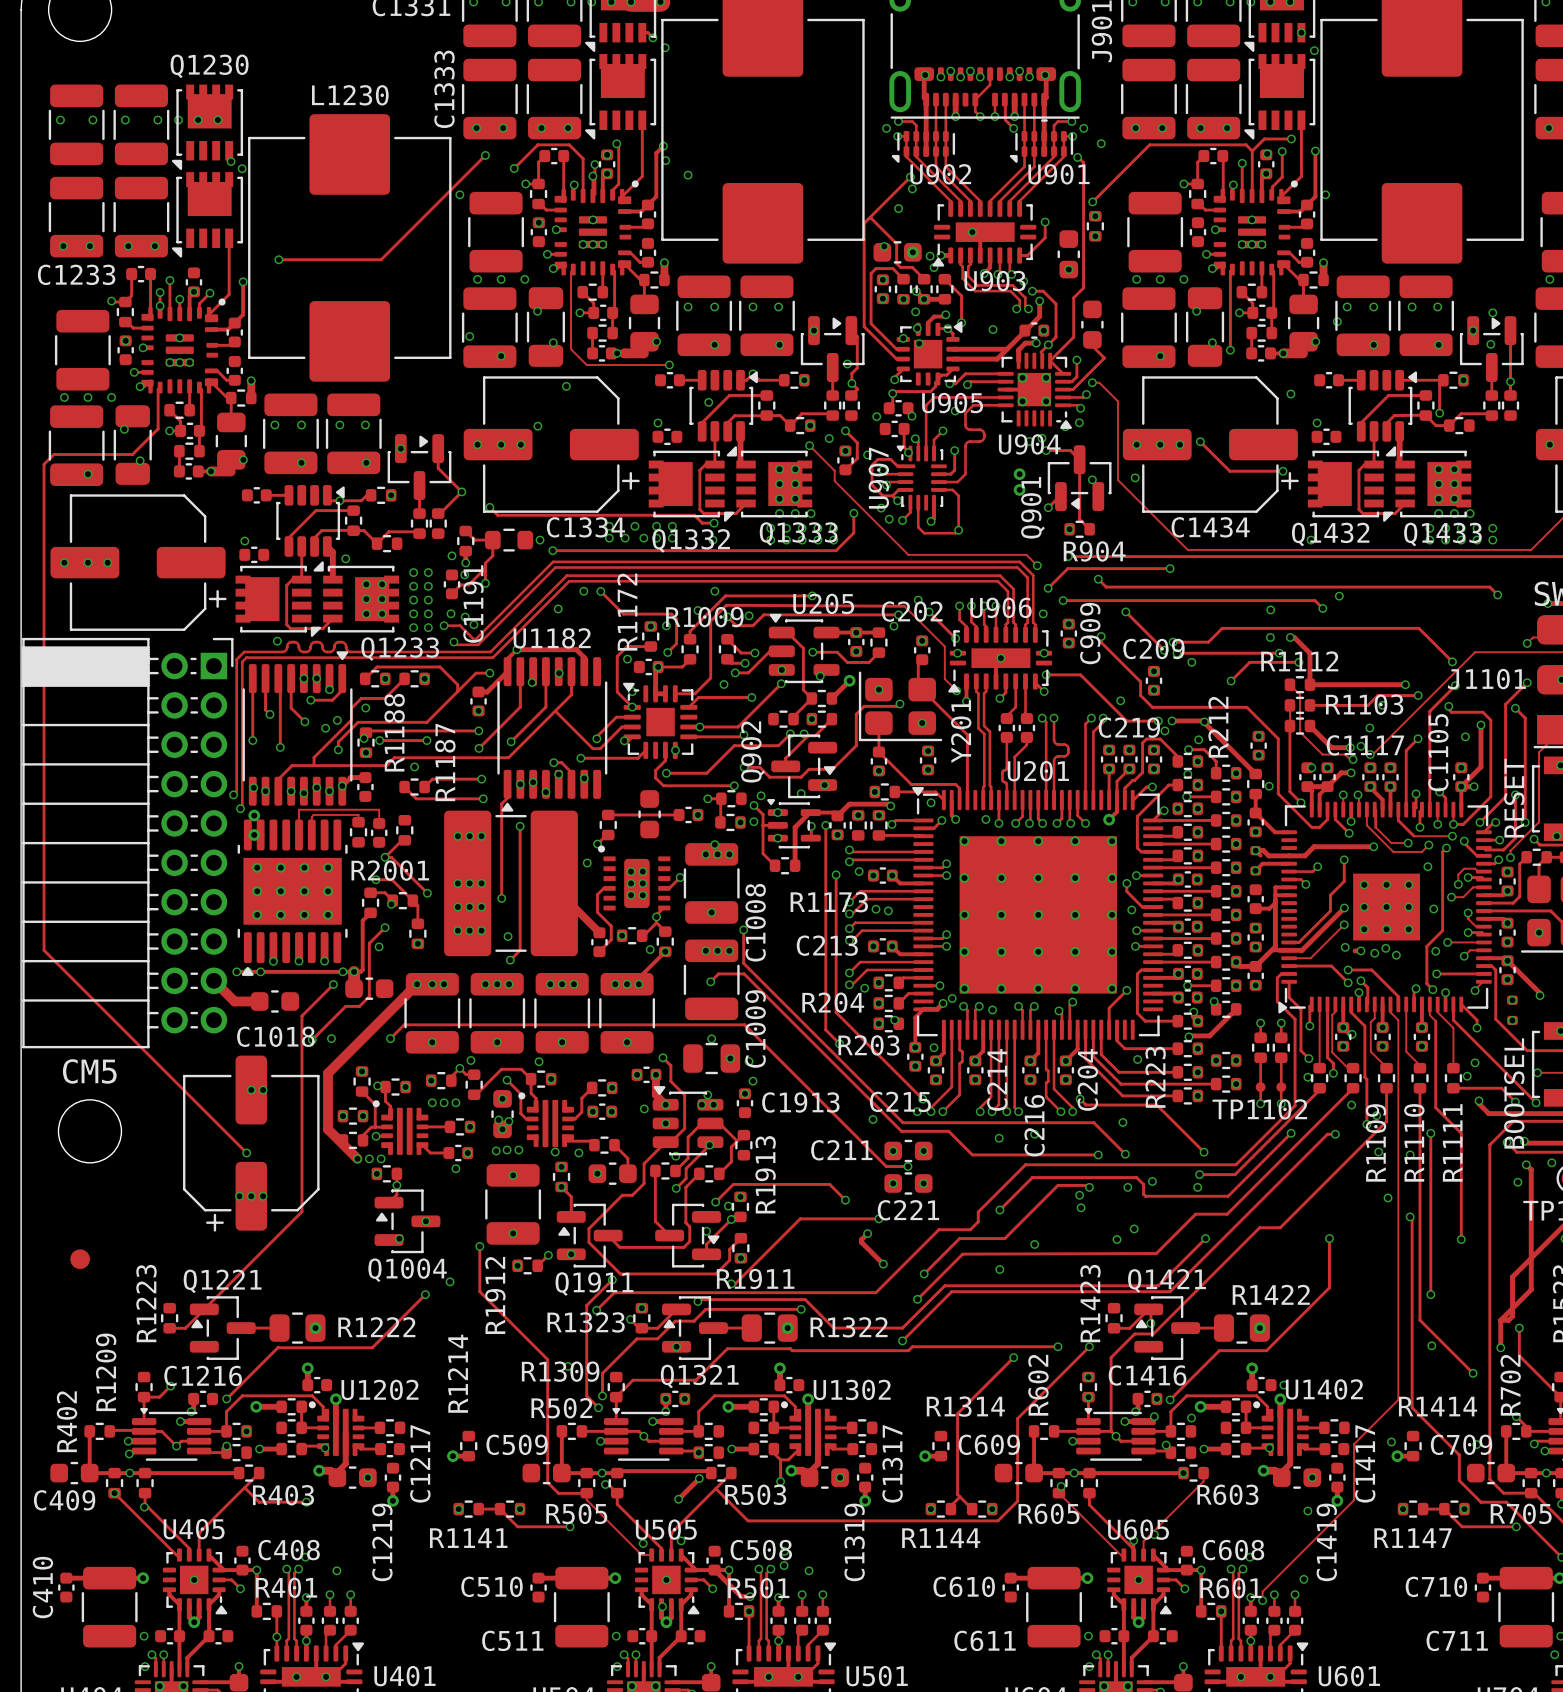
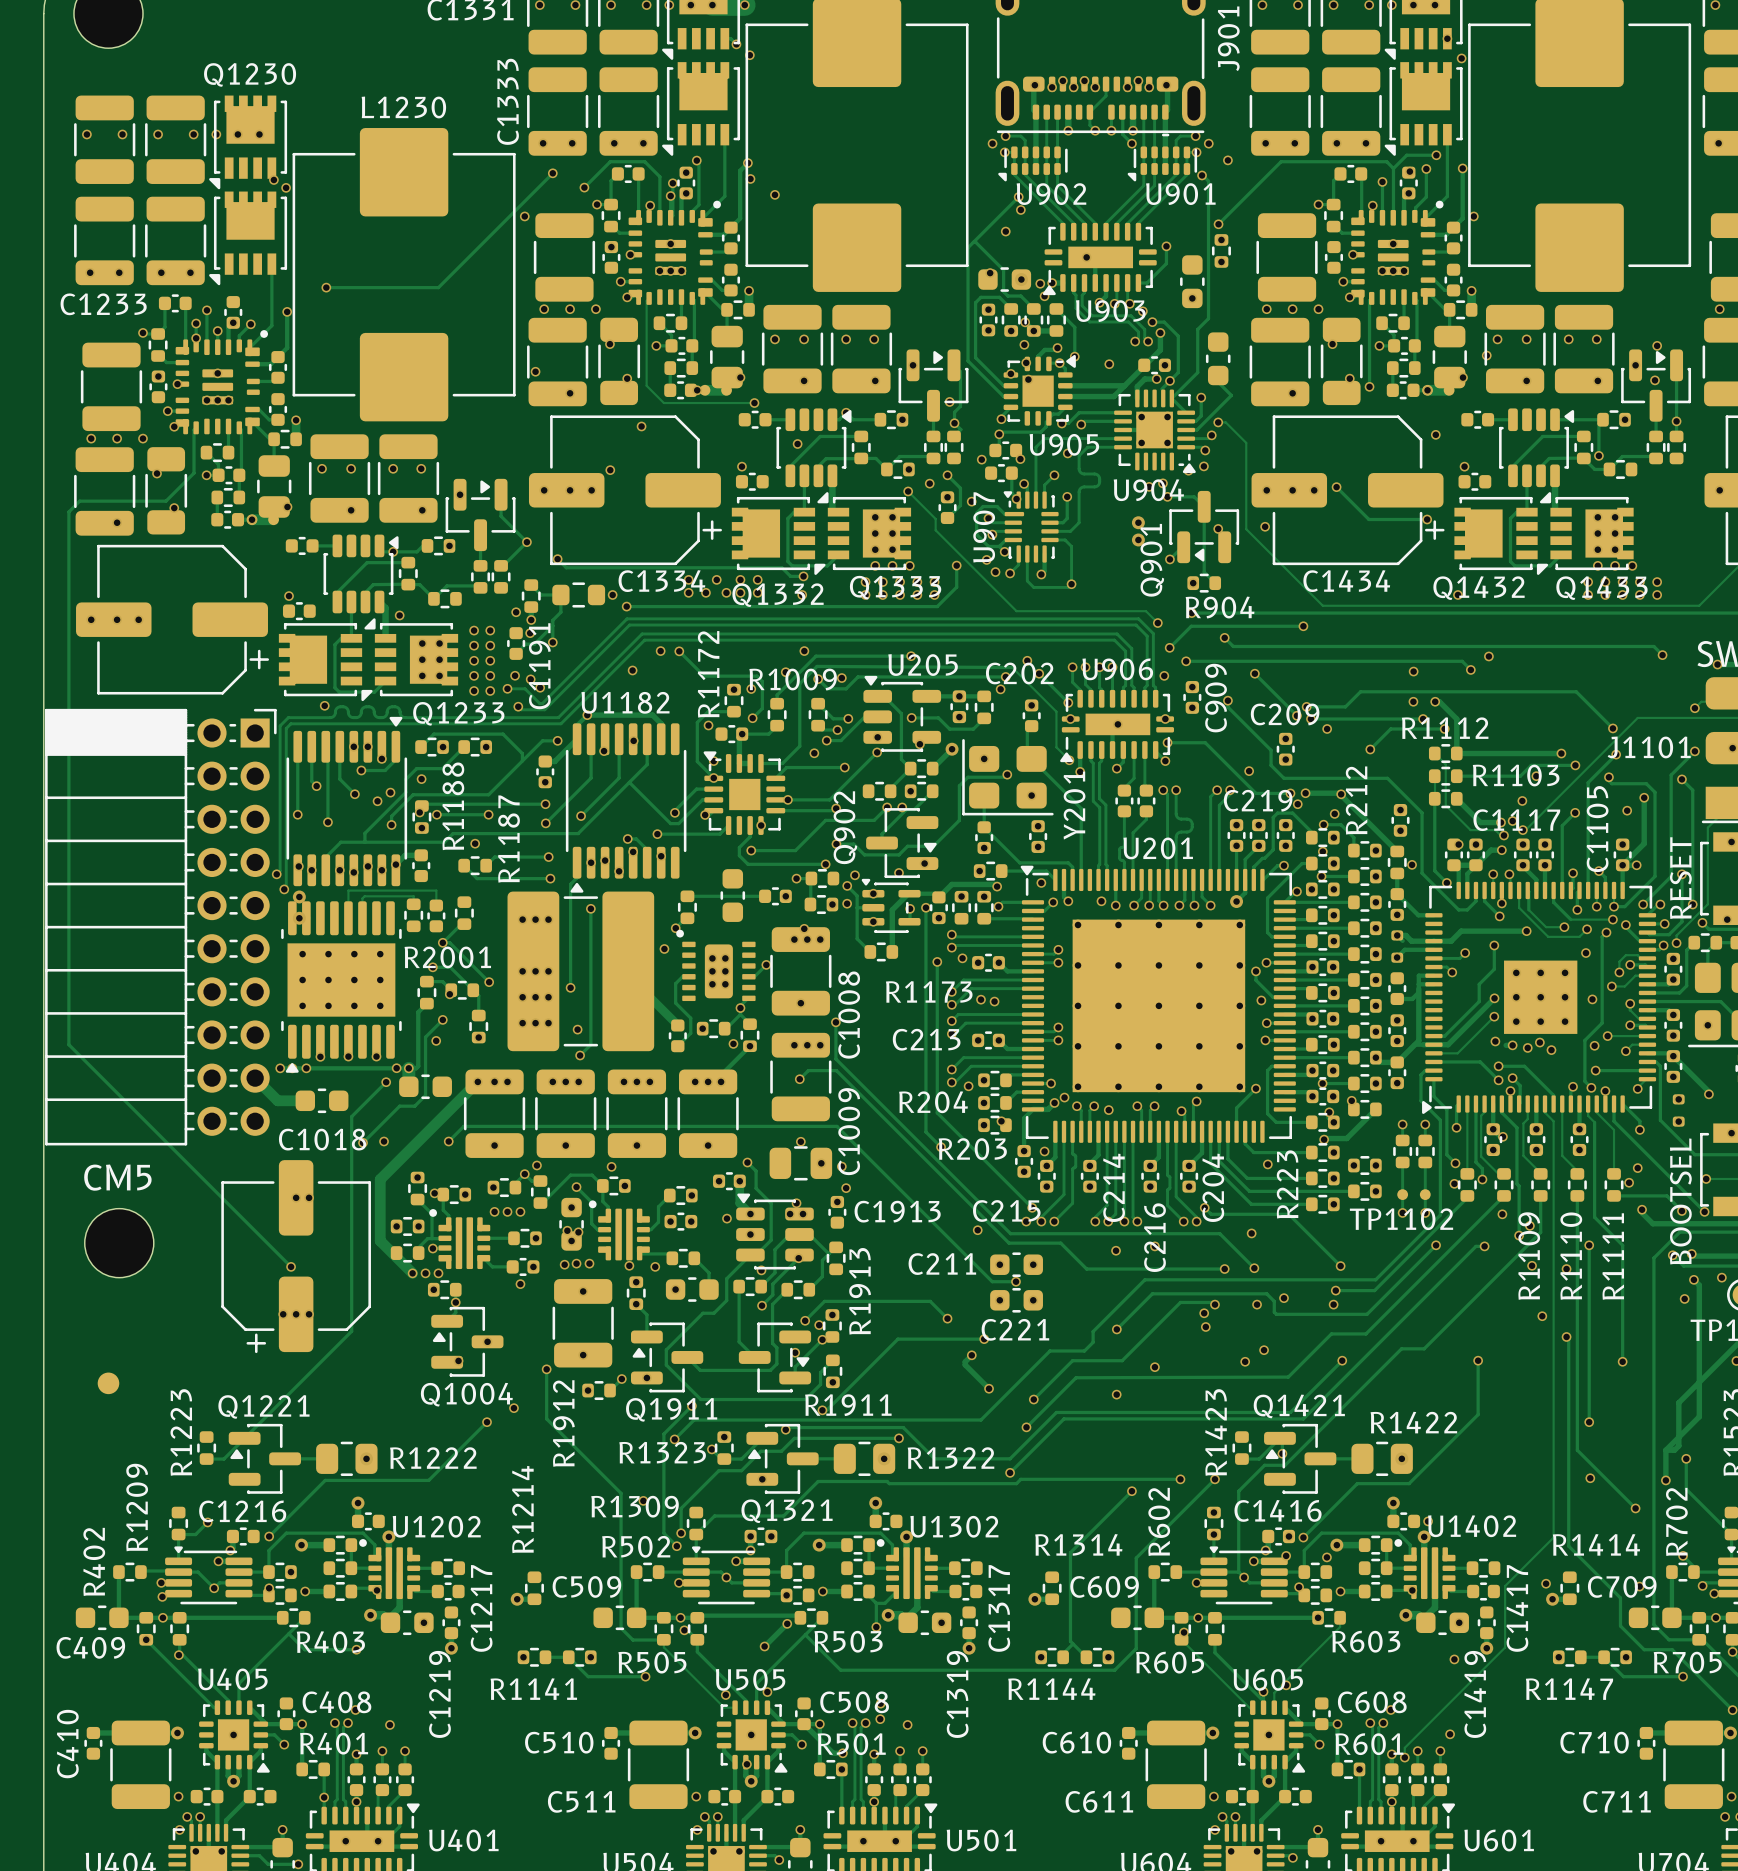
part footprint: [22, 637, 234, 1049] -> [45, 708, 277, 1146]

